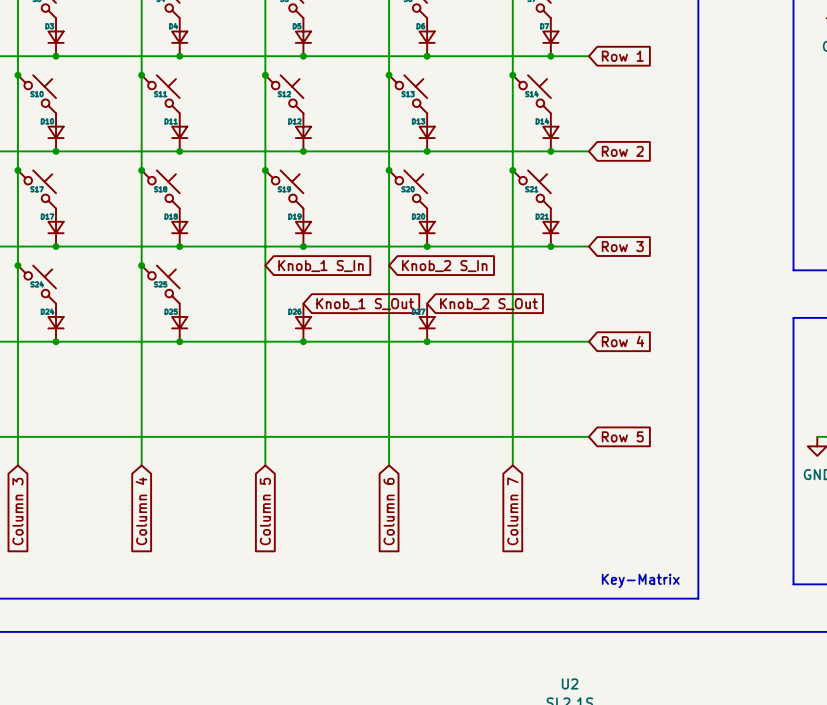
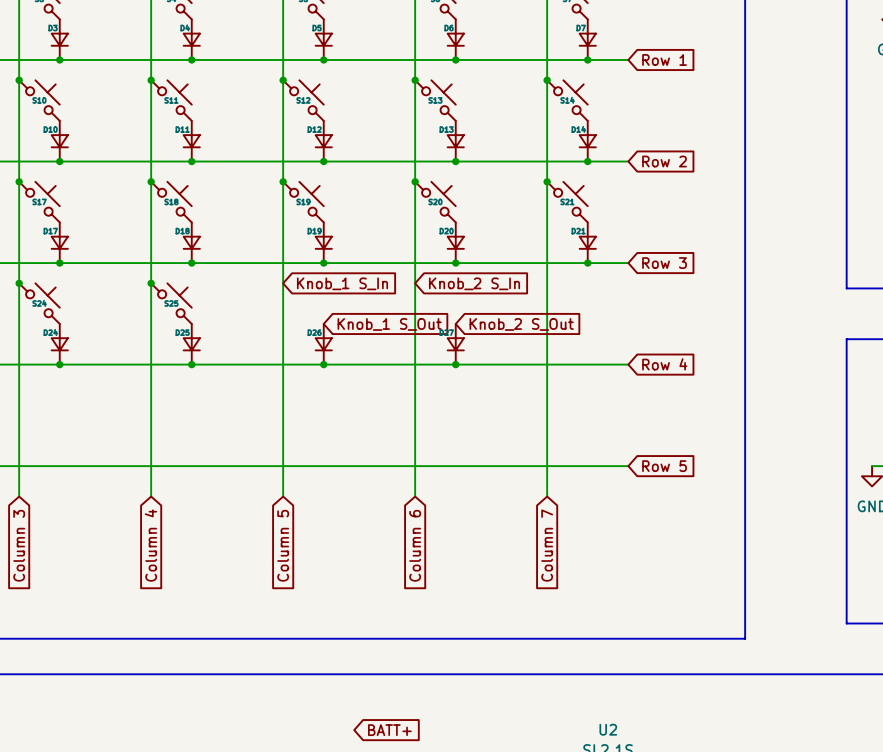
text: Key-Matrix (640, 580) -> none
global label: none -> BATT+ (389, 730)

